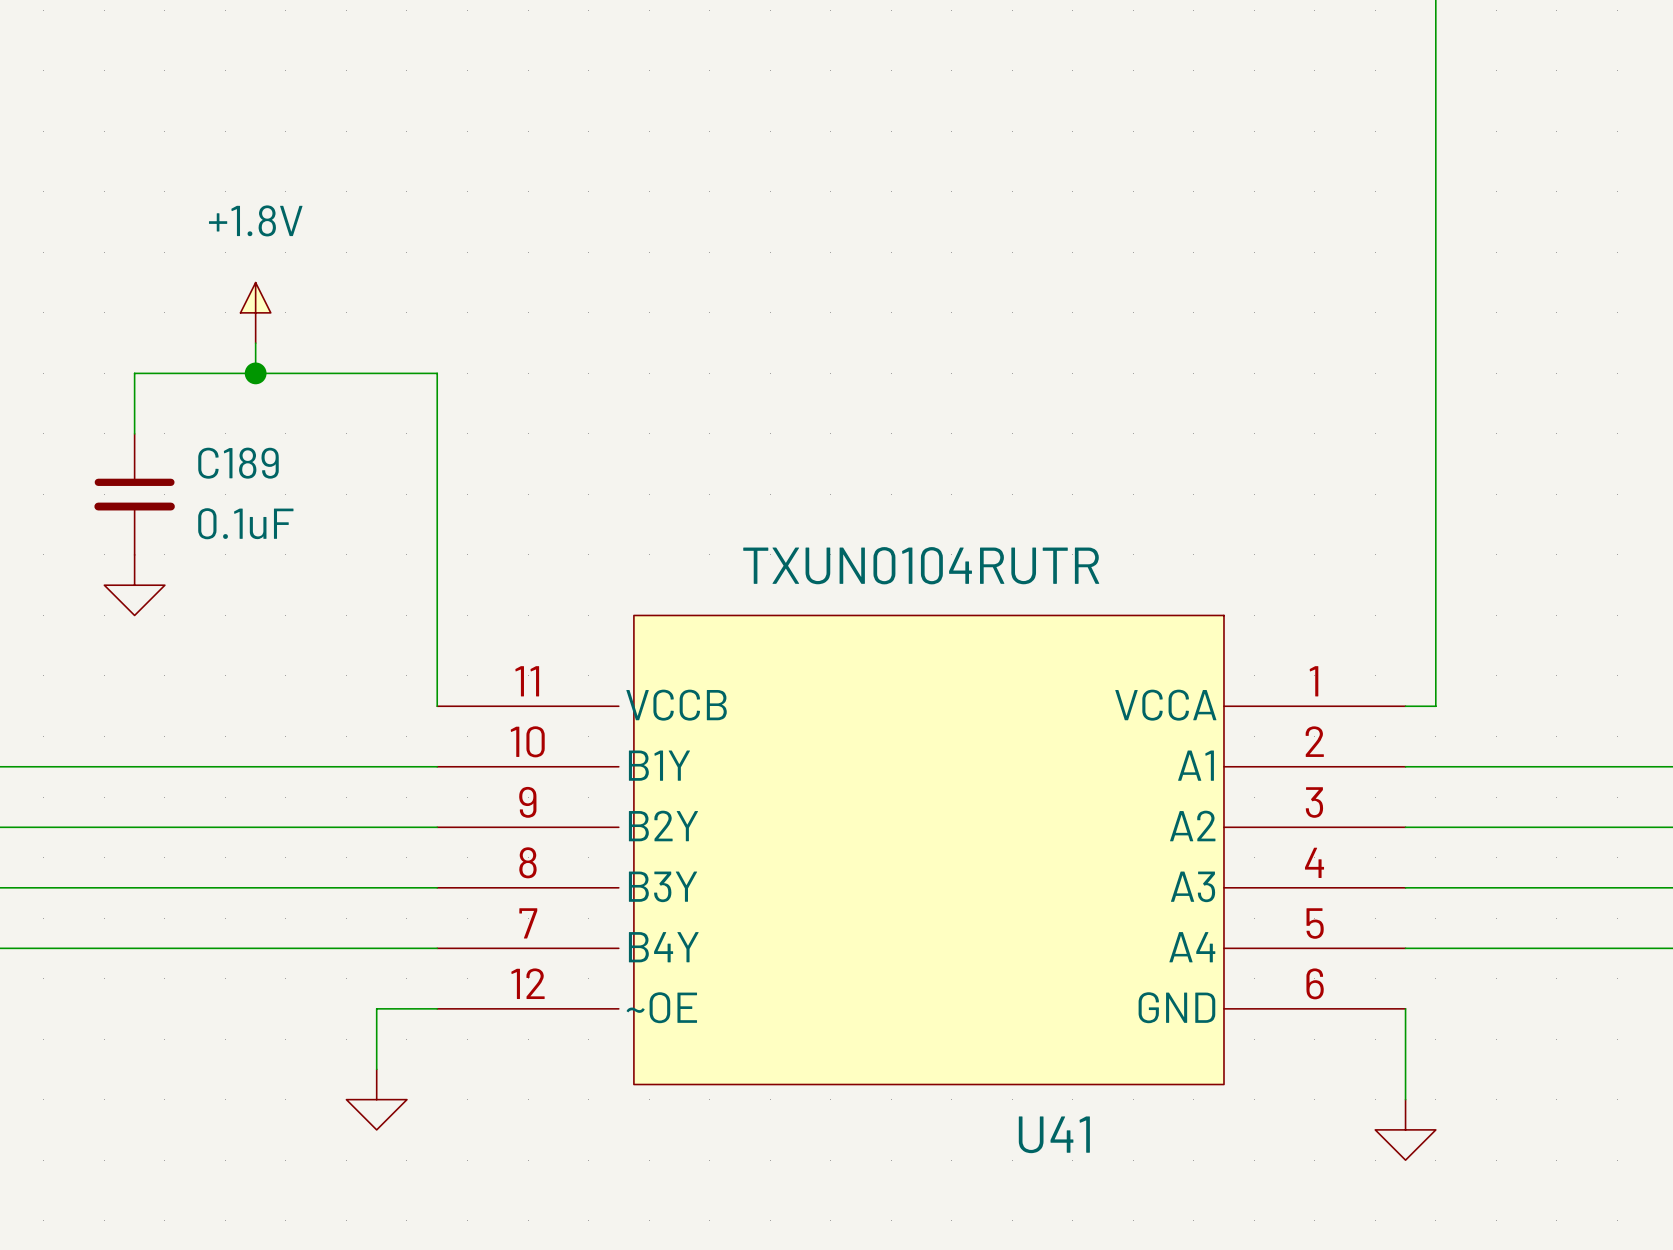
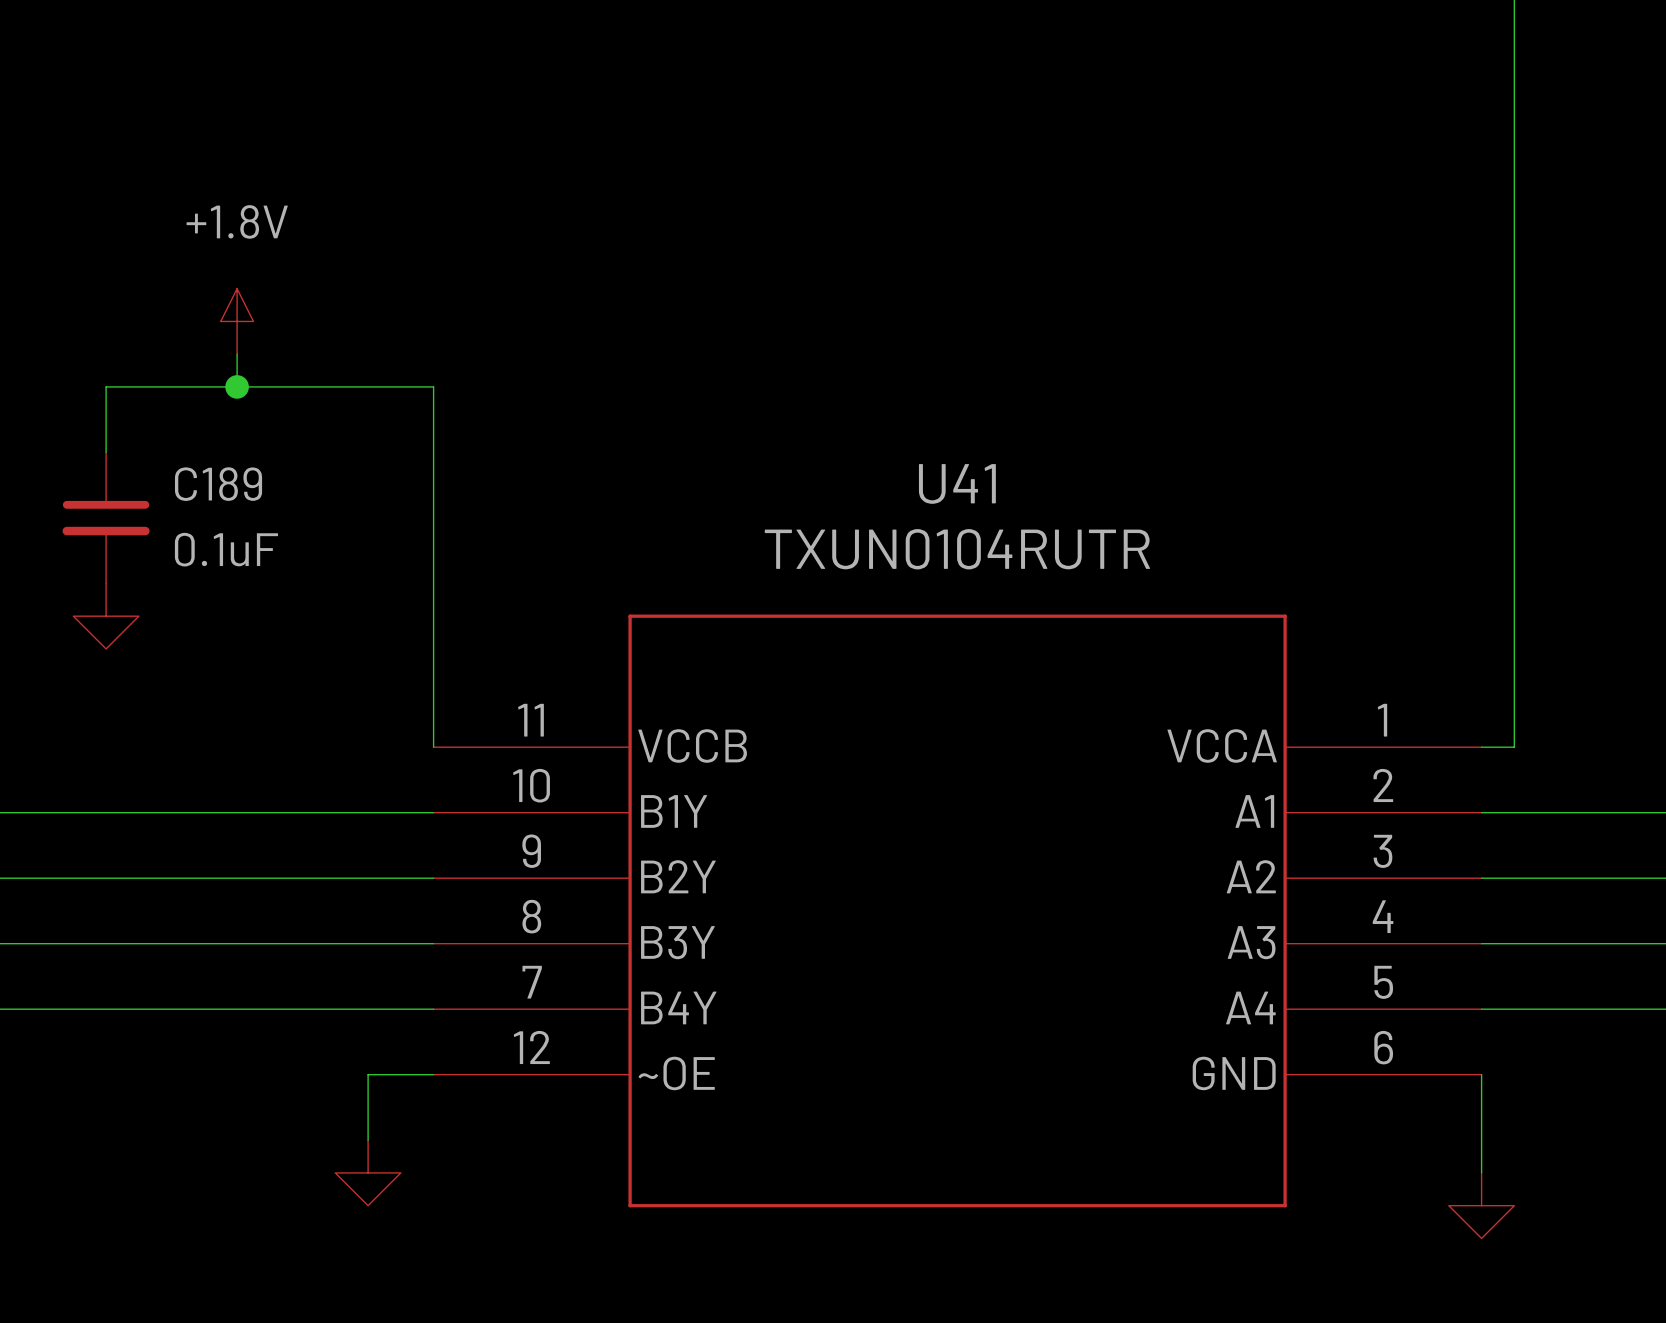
U41 value position: TXUN0104RUTR (921, 565) -> TXUN0104RUTR (957, 549)
U41 symbol: [437, 615, 1406, 1085] -> [433, 614, 1482, 1208]
U41 name position: U41 (1054, 1134) -> U41 (957, 483)

